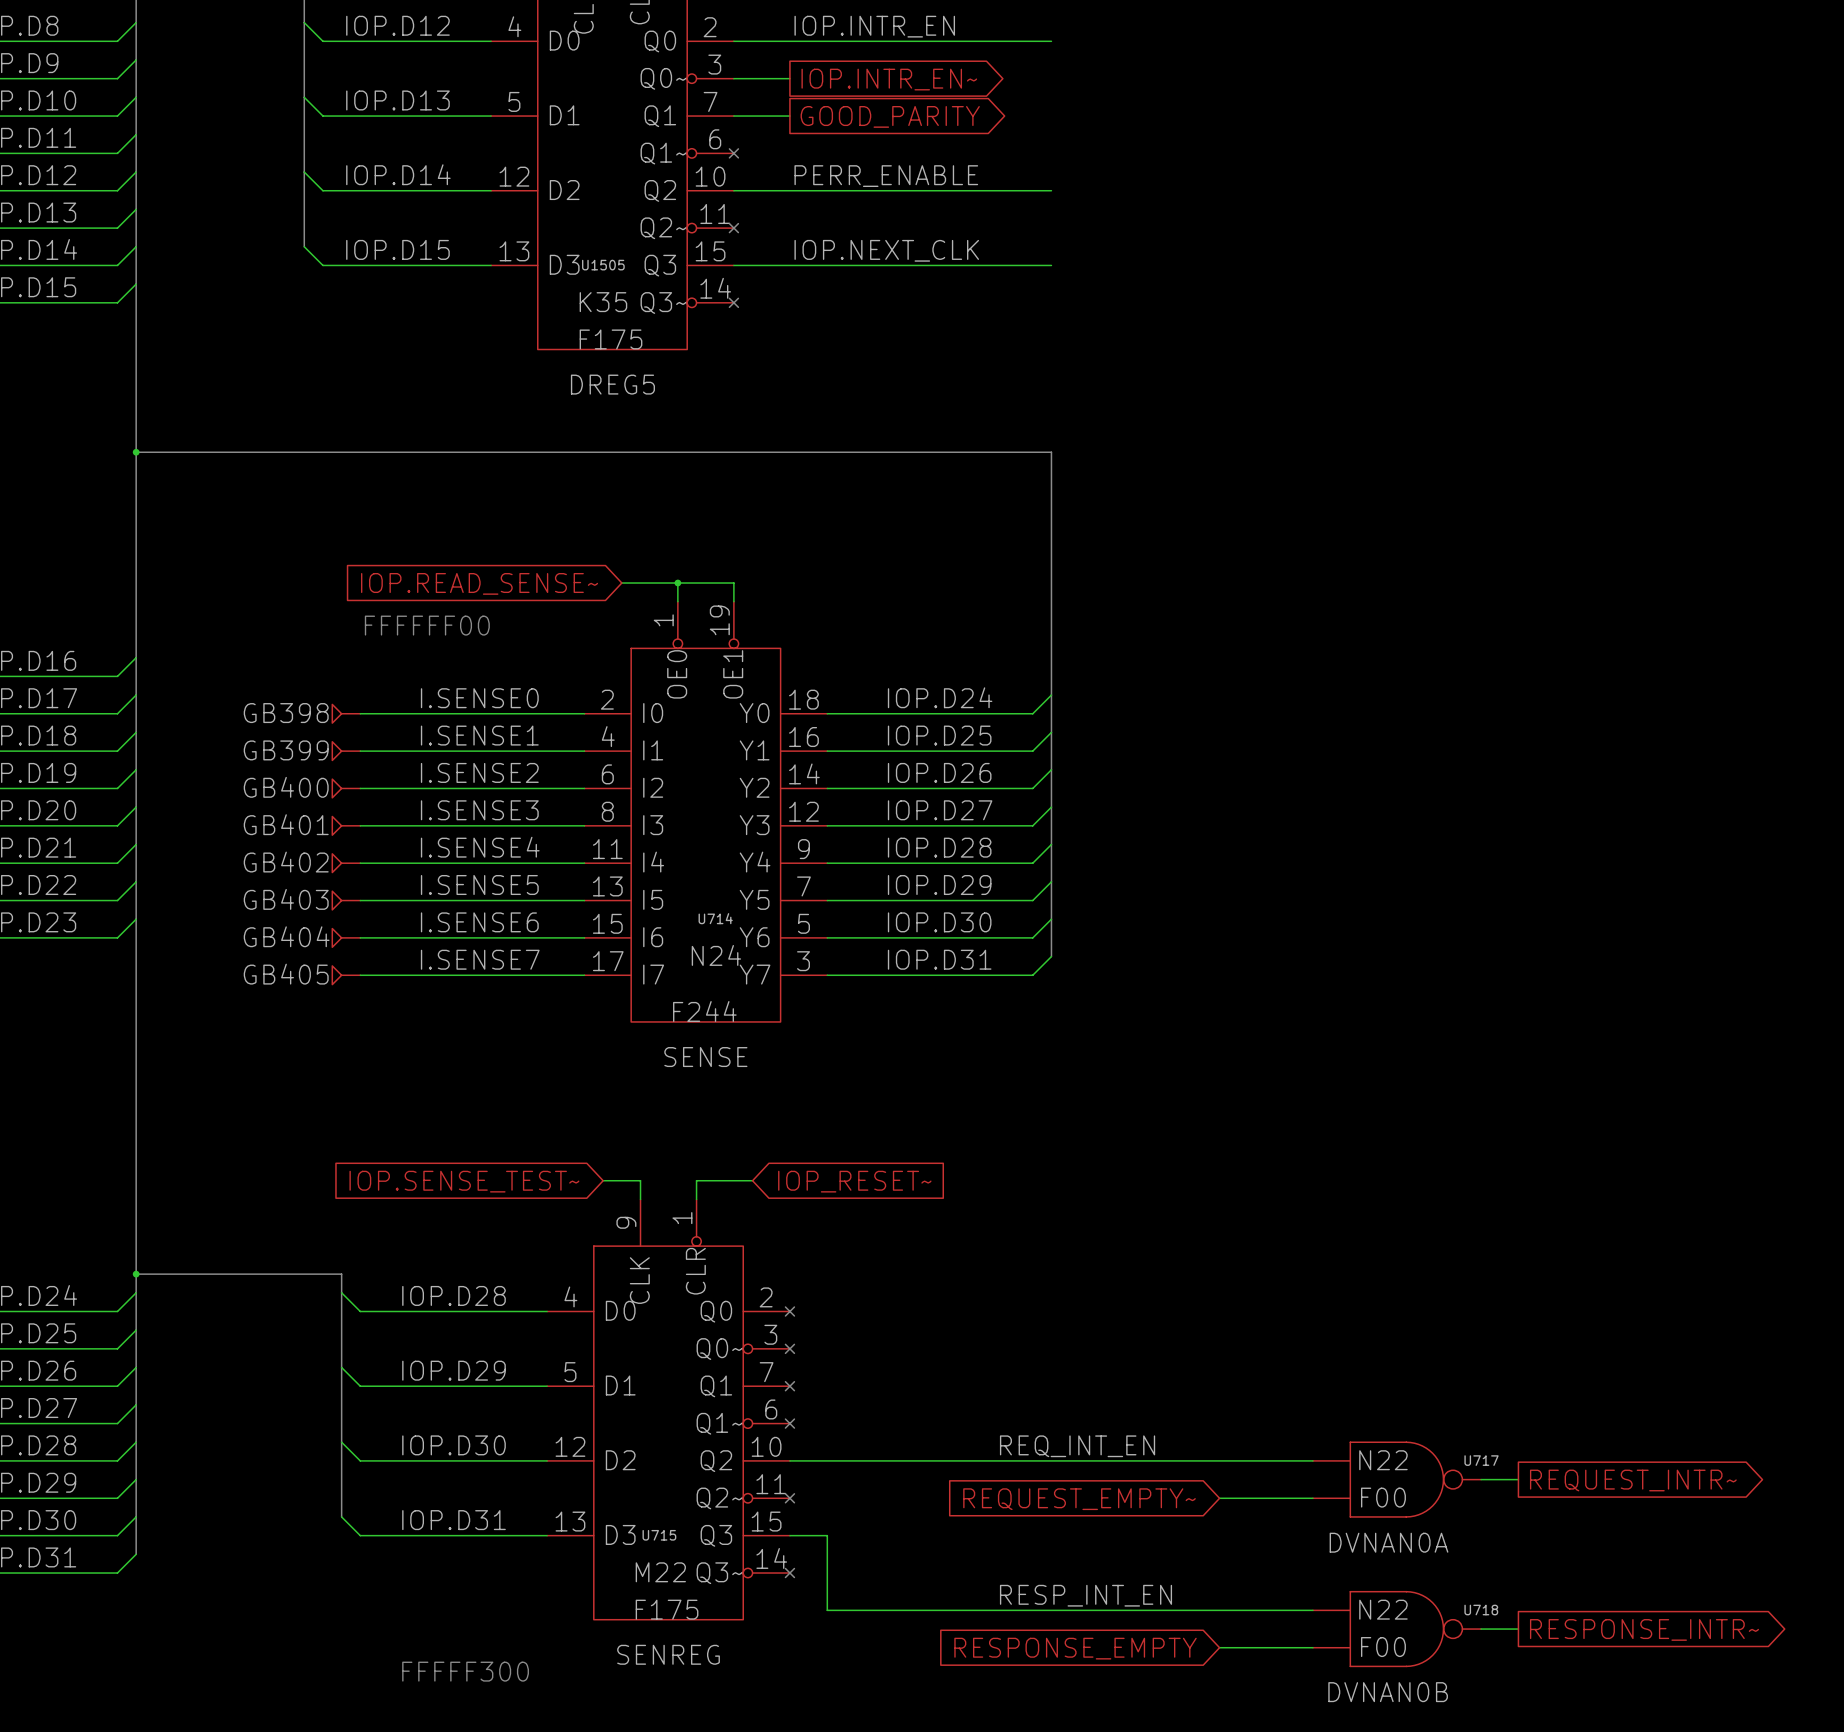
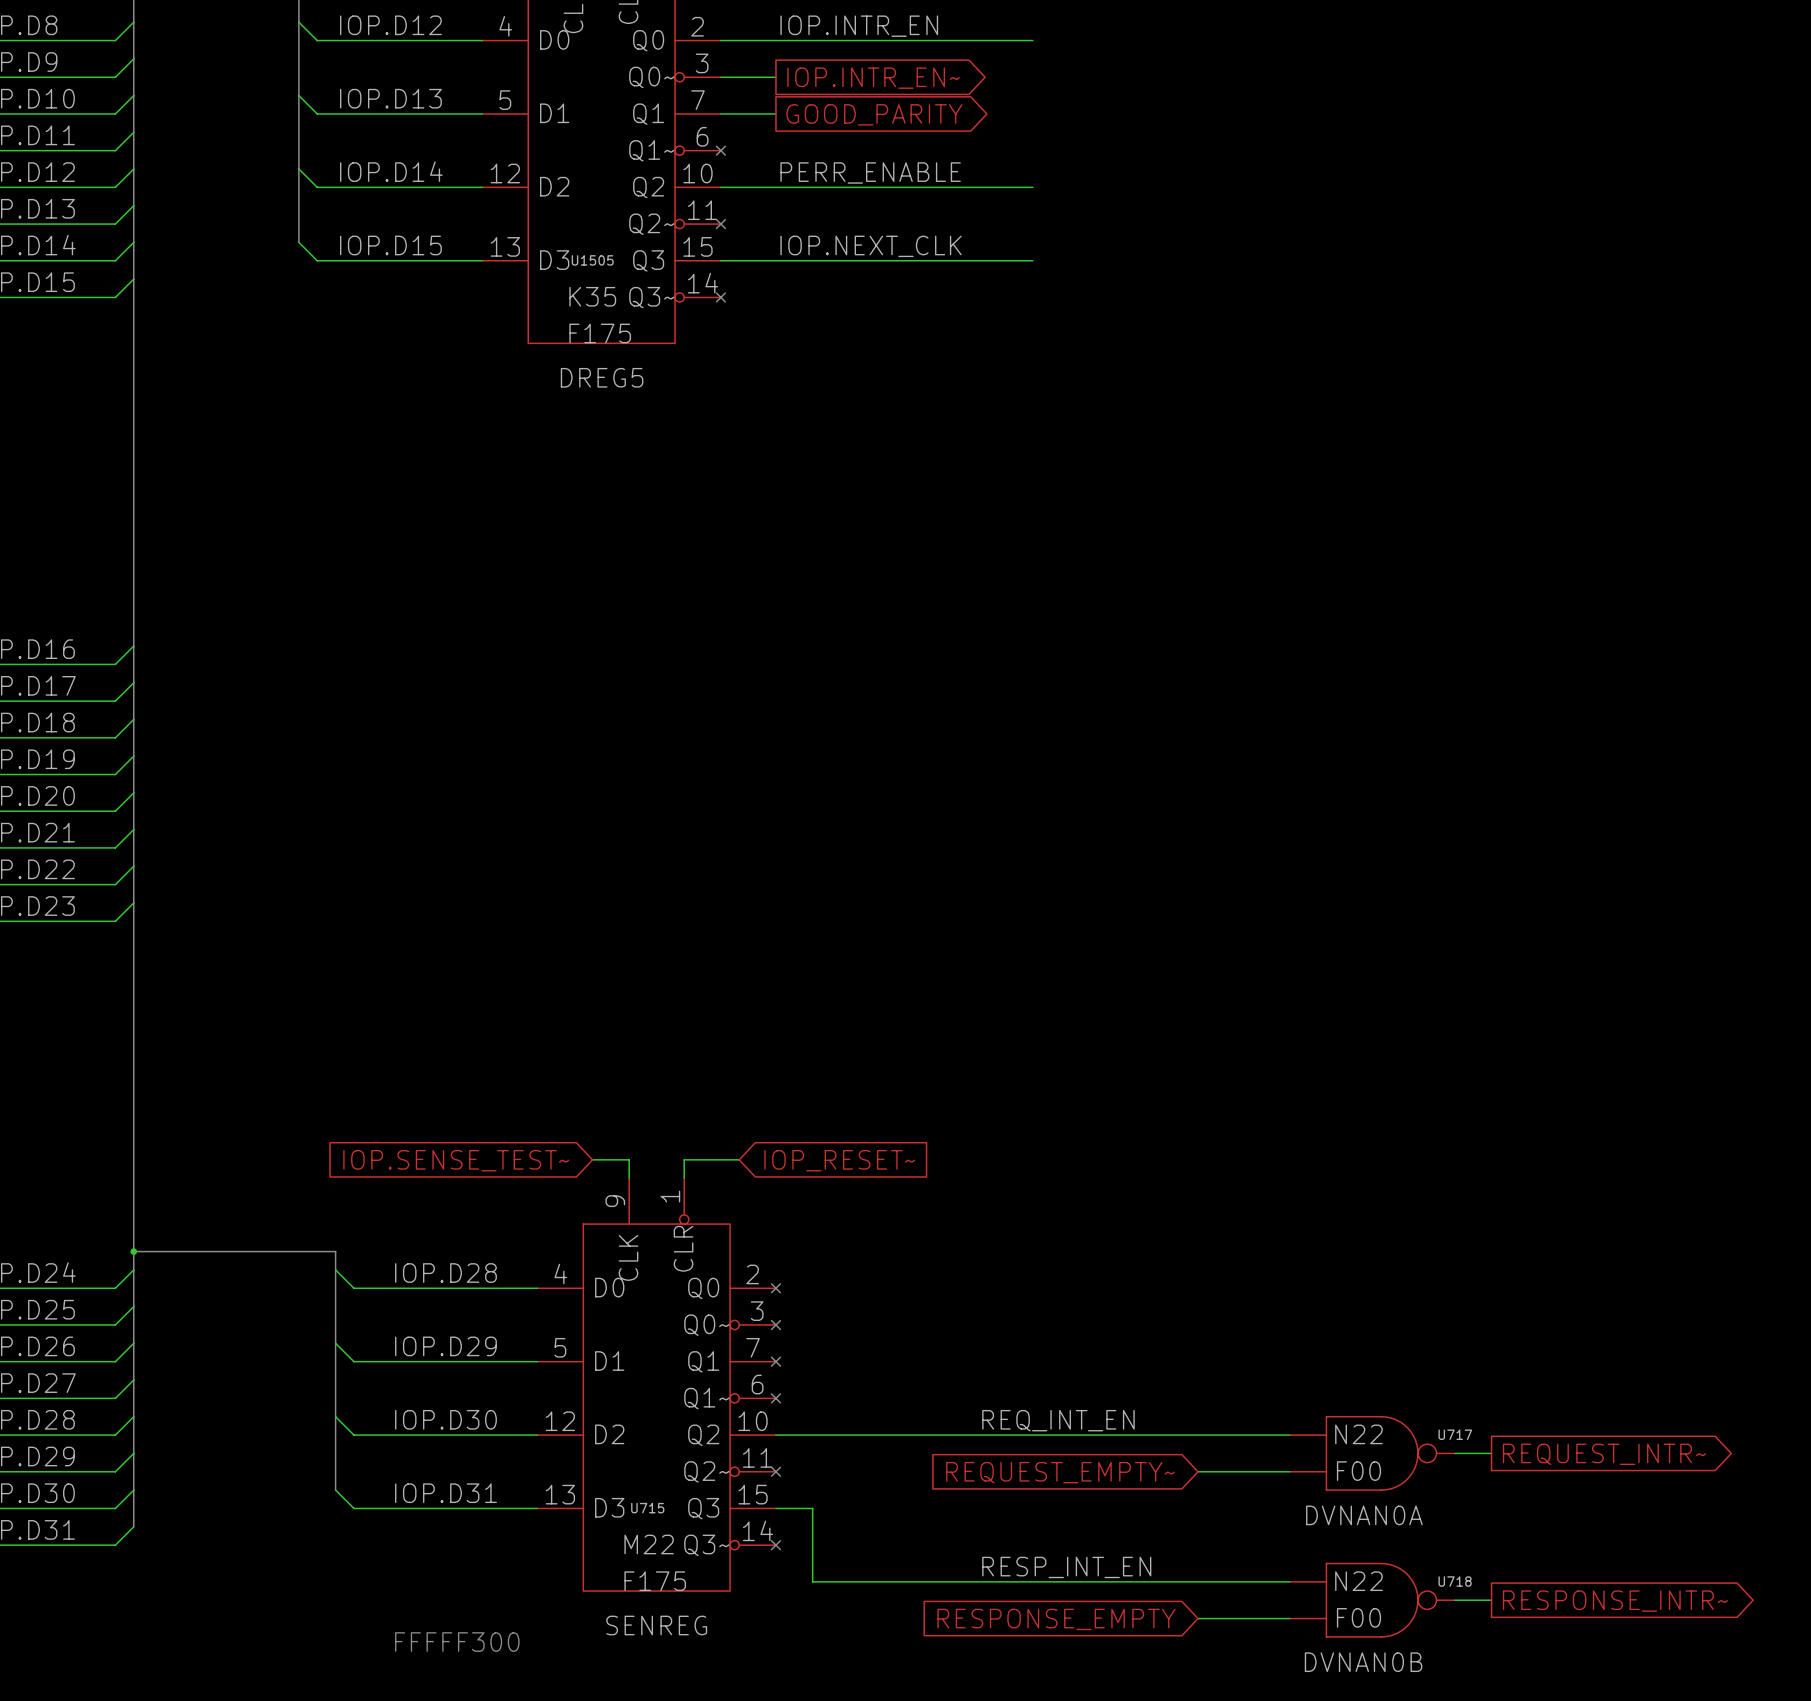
bus: (136, 452) (1051, 452) (1051, 956) -> none
junction: (136, 452) -> none
global label: IOP.READ_SENSE~ (479, 583) -> none
wire: (621, 583) (733, 583) (733, 601) -> none
wire: (677, 583) (677, 601) -> none
junction: (677, 583) -> none
text: FFFFFF00 (427, 625) -> none
wire: (1051, 695) (1032, 713) (827, 713) -> none
label: IOP.D24 (940, 697) -> none
label: I.SENSE0 (479, 698) -> none
GB398: (346, 713) -> none
wire: (360, 713) (584, 713) -> none
wire: (1051, 732) (1032, 751) (827, 751) -> none
label: I.SENSE1 (479, 735) -> none
label: IOP.D25 (939, 735) -> none
GB399: (346, 751) -> none
wire: (360, 751) (584, 751) -> none
wire: (1051, 769) (1032, 788) (827, 788) -> none
label: I.SENSE2 (479, 772) -> none
label: IOP.D26 (939, 772) -> none
GB400: (346, 788) -> none
wire: (360, 788) (584, 788) -> none
wire: (1051, 807) (1032, 825) (827, 825) -> none
label: I.SENSE3 (479, 810) -> none
label: IOP.D27 (940, 810) -> none
U714: F244 (705, 811) -> none
GB401: (346, 825) -> none
wire: (360, 825) (584, 825) -> none
wire: (1051, 844) (1032, 863) (827, 863) -> none
label: I.SENSE4 (480, 847) -> none
label: IOP.D28 (939, 847) -> none
GB402: (346, 863) -> none
wire: (360, 863) (584, 863) -> none
wire: (1051, 881) (1032, 900) (827, 900) -> none
label: I.SENSE5 (479, 885) -> none
label: IOP.D29 (939, 885) -> none
GB403: (346, 900) -> none
wire: (360, 900) (584, 900) -> none
wire: (1051, 919) (1032, 937) (827, 937) -> none
label: I.SENSE6 (479, 922) -> none
label: IOP.D30 (939, 922) -> none
GB404: (346, 937) -> none
wire: (360, 937) (584, 937) -> none
wire: (1051, 956) (1032, 975) (827, 975) -> none
label: I.SENSE7 (480, 959) -> none
label: IOP.D31 (939, 959) -> none
GB405: (346, 975) -> none
wire: (360, 975) (584, 975) -> none

